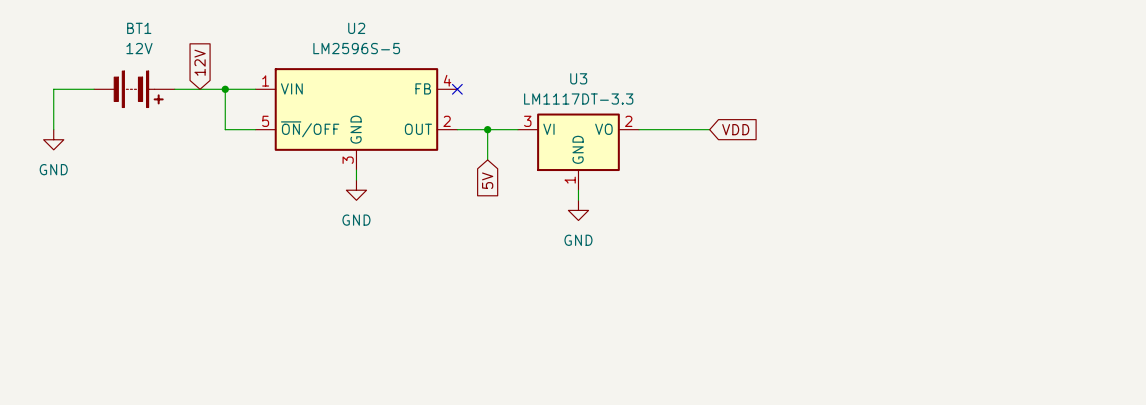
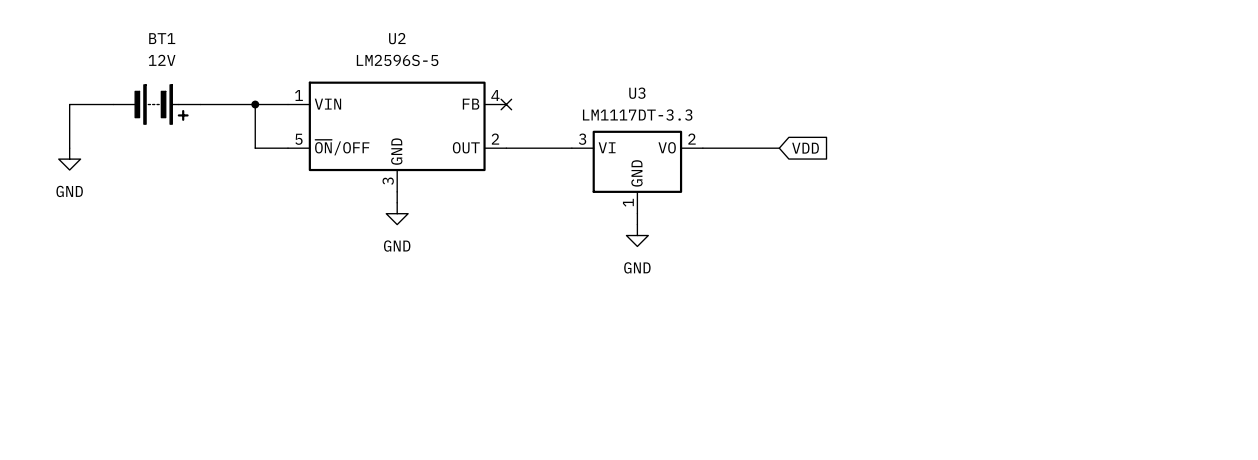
global label: 12V (200, 62) -> none
wire: (487, 129) (487, 159) -> none
junction: (487, 129) -> none
global label: 5V (487, 180) -> none

